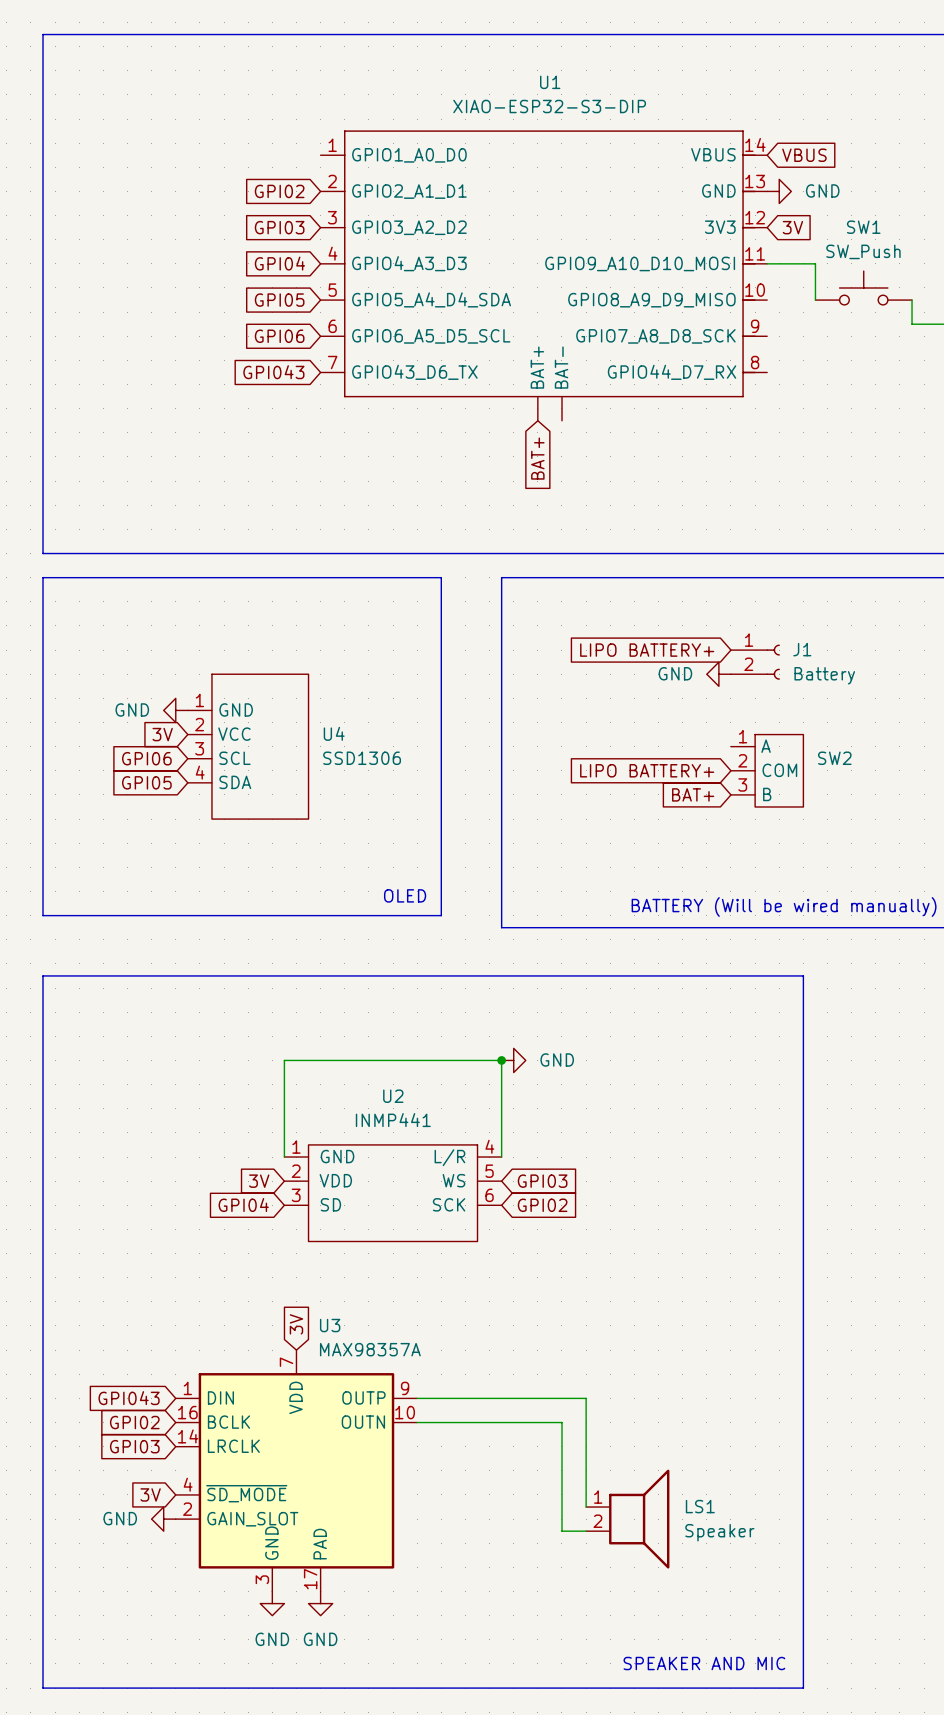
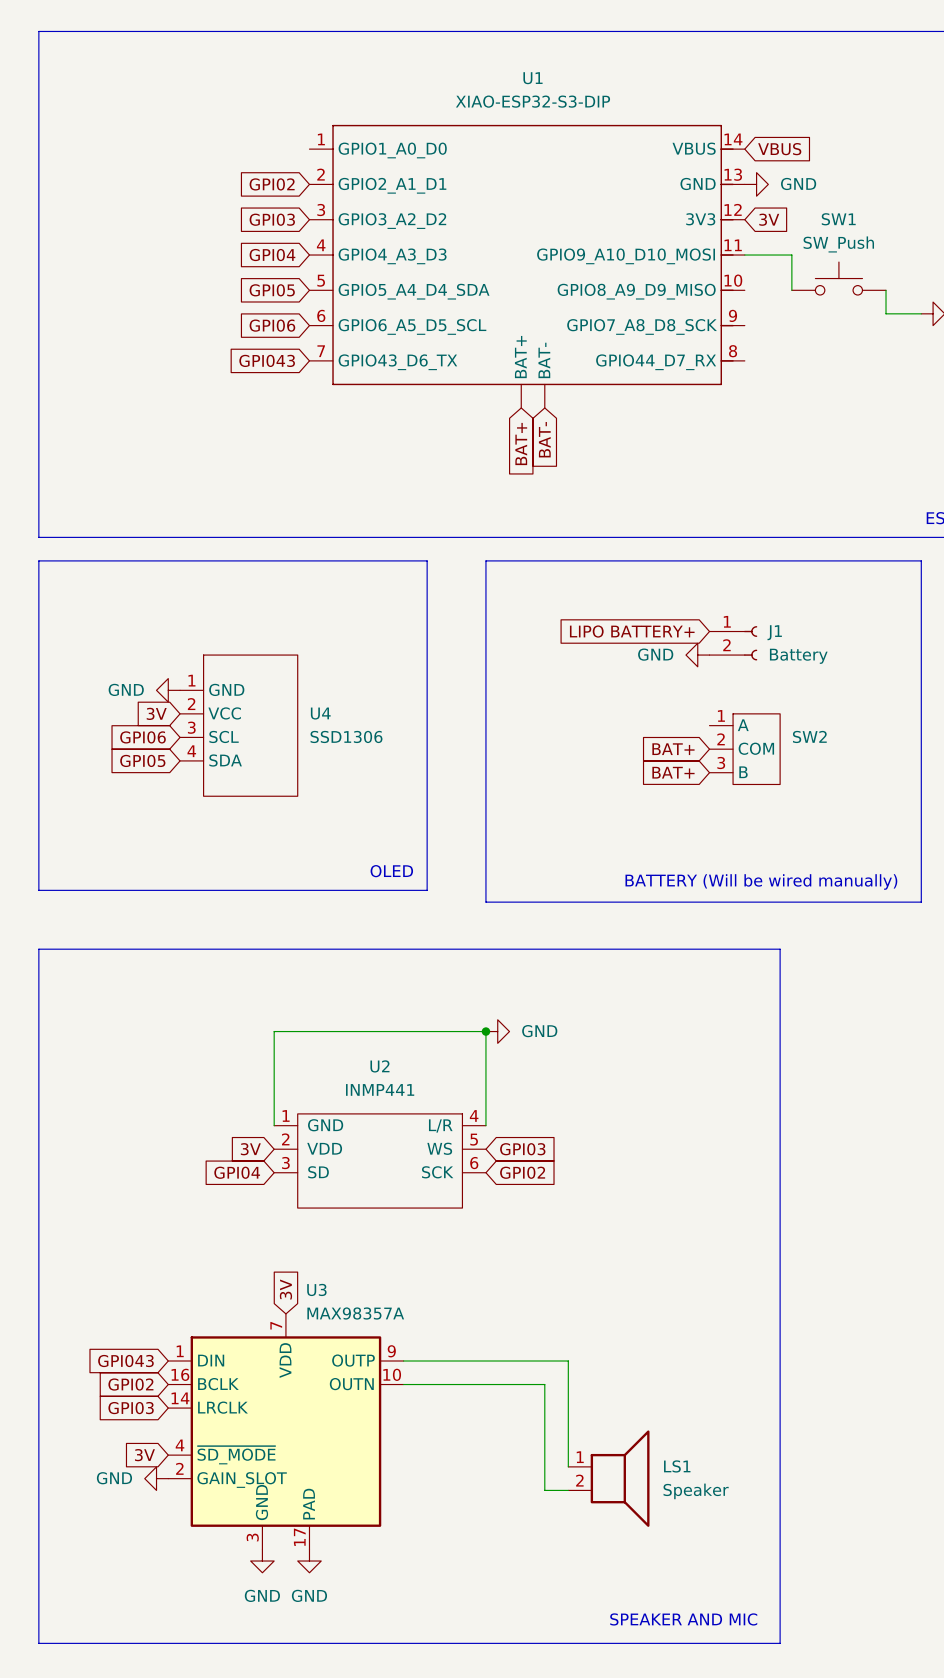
global label: none -> BAT- (544, 439)
global label: LIPO BATTERY+ (647, 770) -> BAT+ (673, 749)

